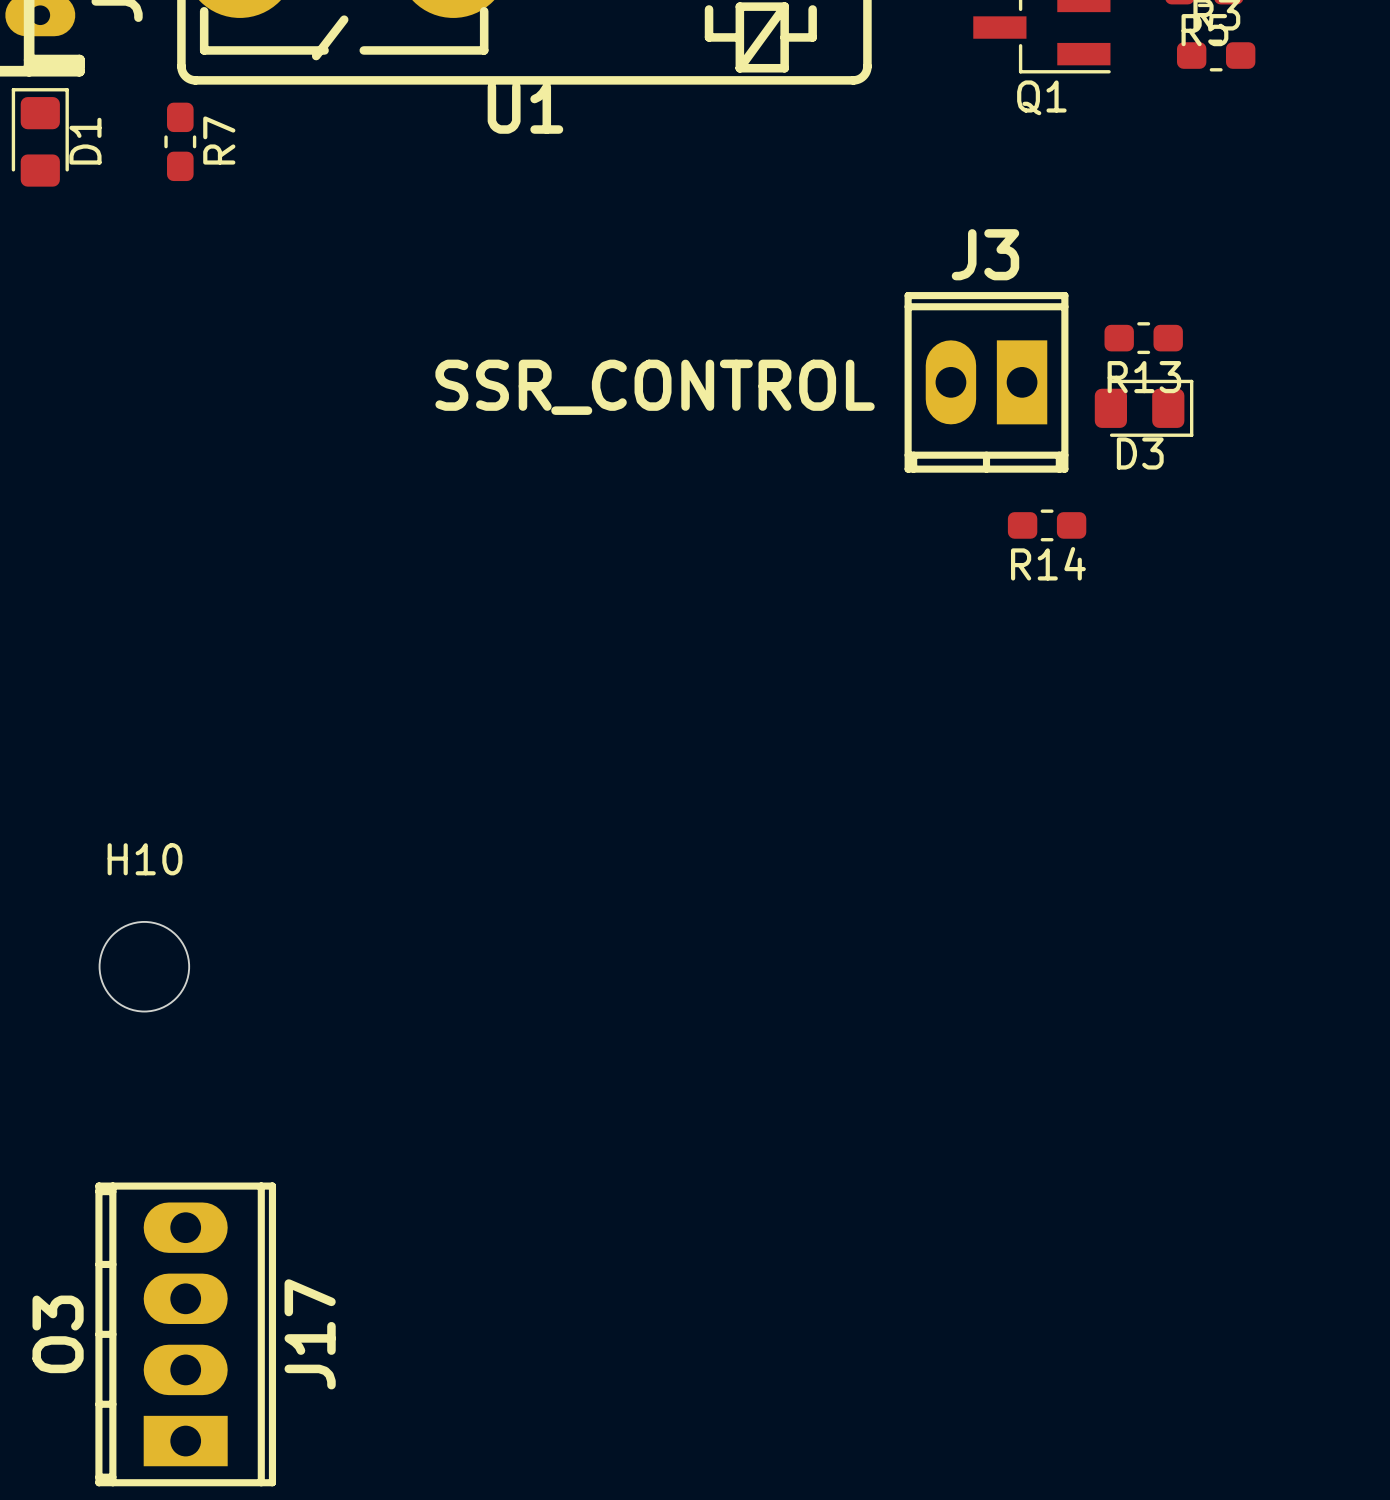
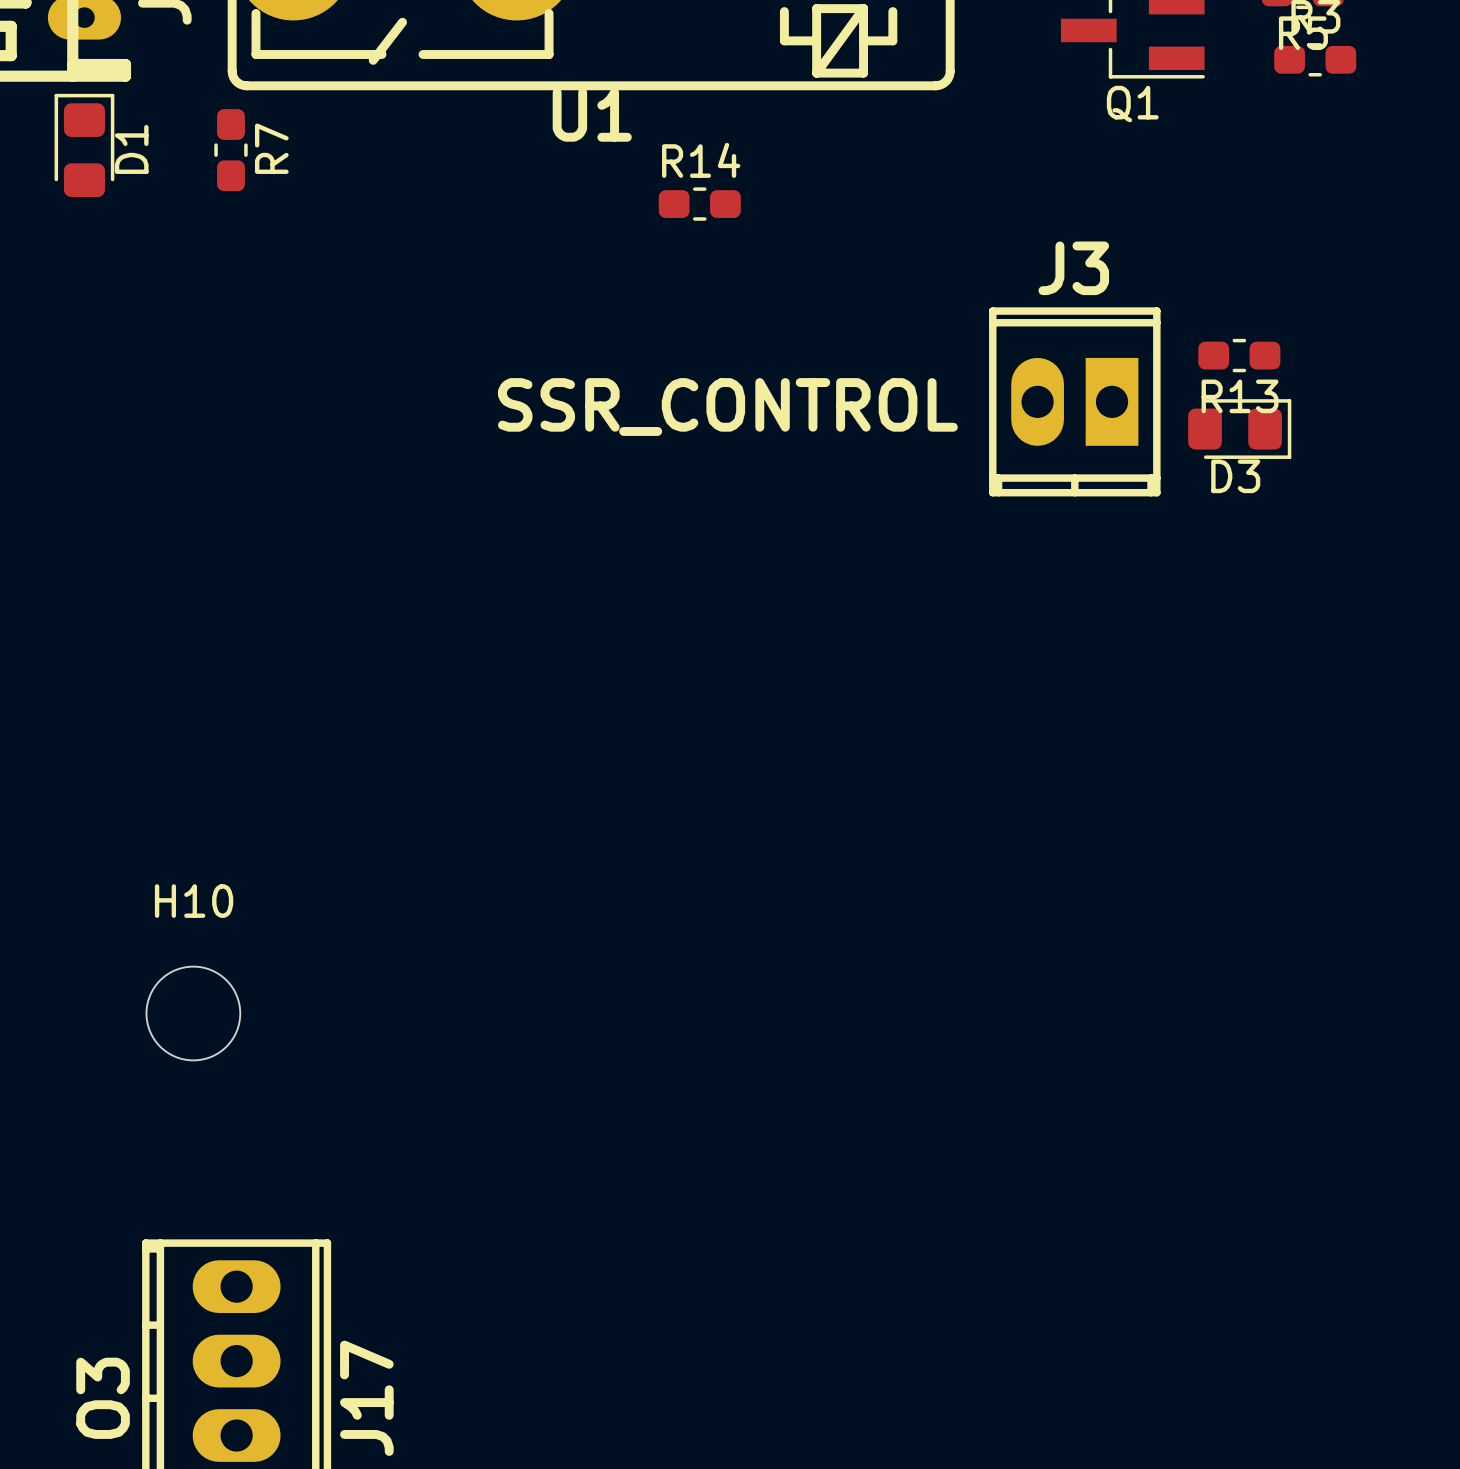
R14 position: (1047, 525) -> (699, 204)
R14 name position: R14 (1048, 563) -> R14 (701, 160)

